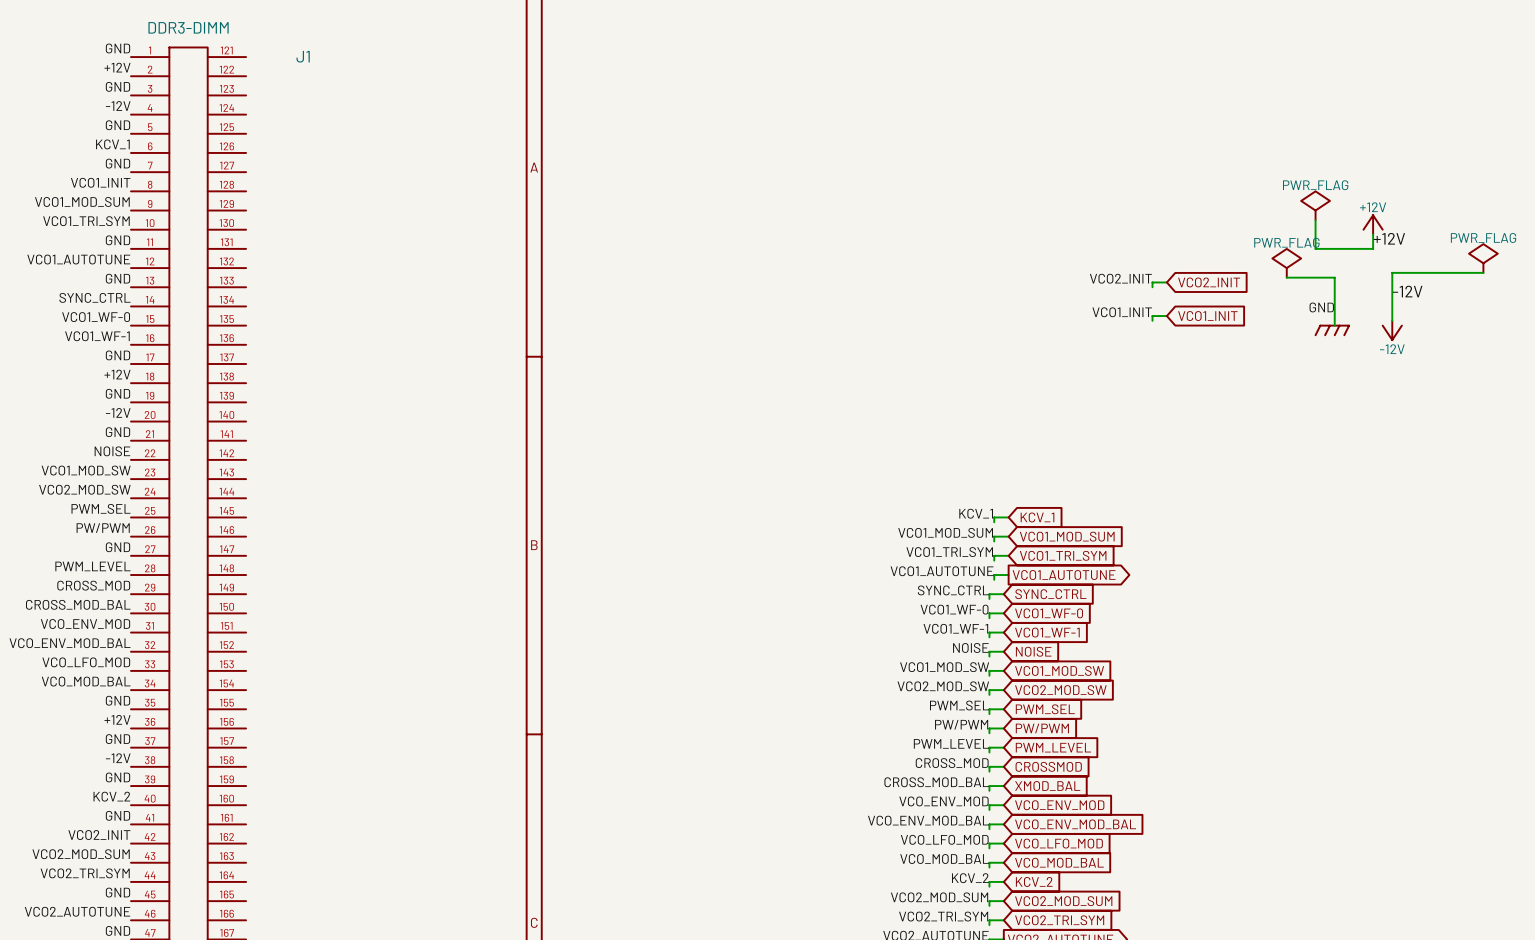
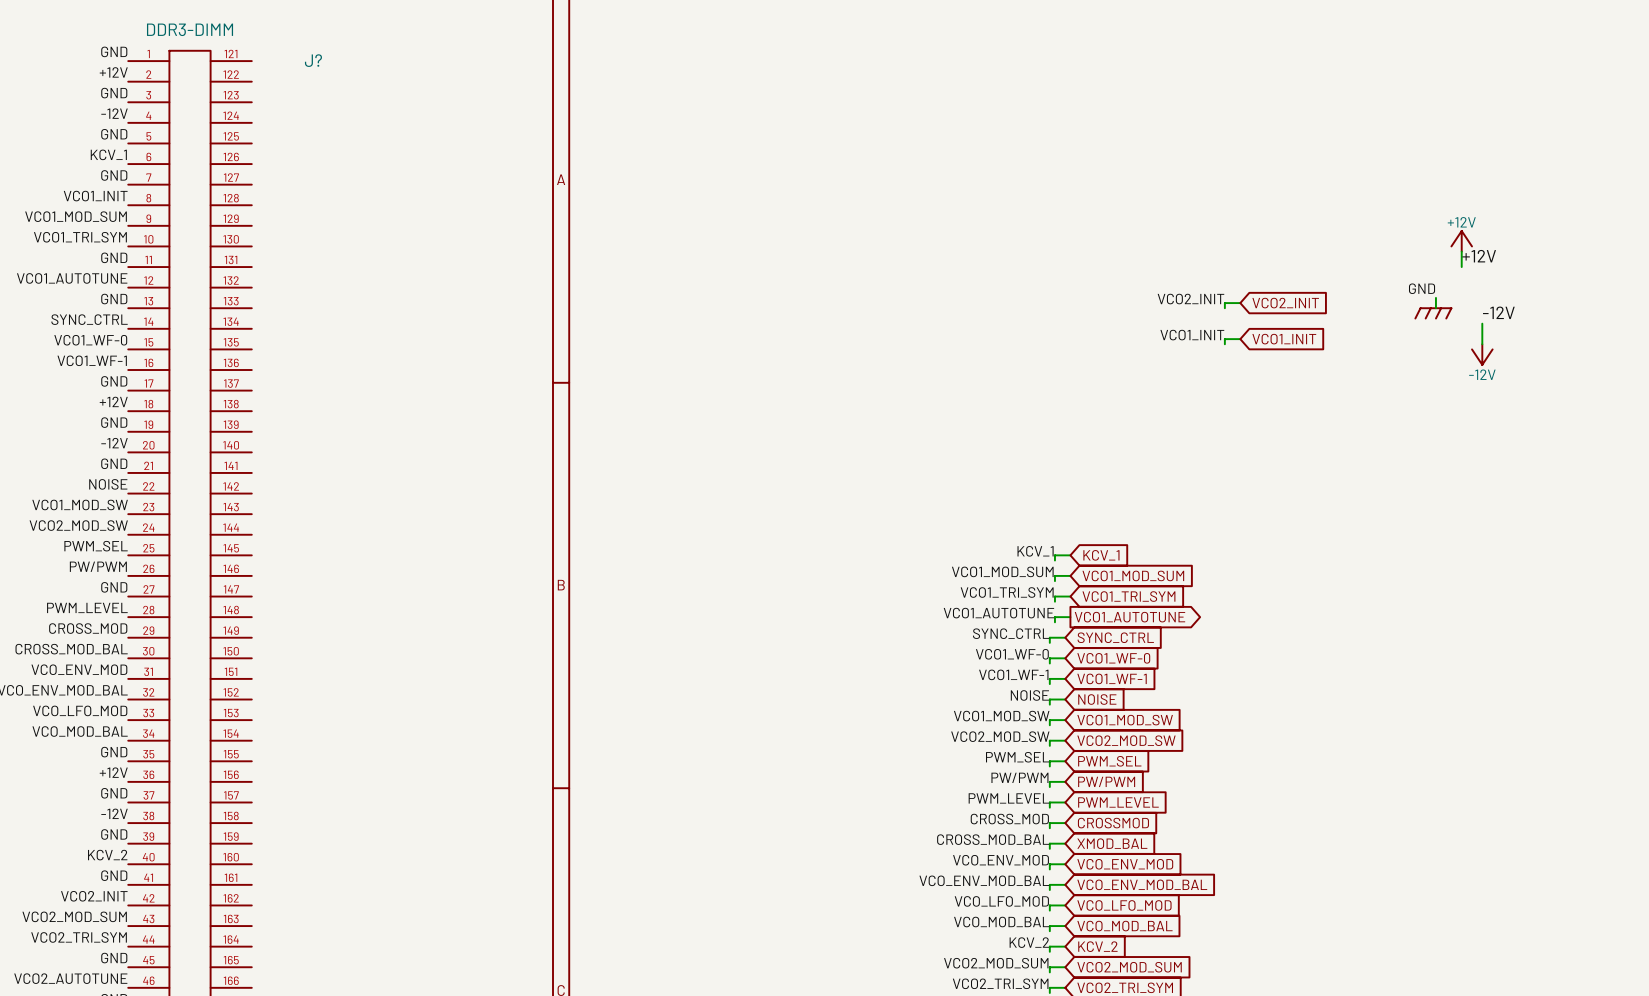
J1 name: J1 (303, 56) -> J? (313, 60)
power symbol: PWR_FLAG (1315, 205) -> none
wire: (1315, 220) (1315, 248) (1373, 248) -> none
power symbol: PWR_FLAG (1483, 258) -> none
power symbol: PWR_FLAG (1286, 263) -> none
wire: (1483, 272) (1392, 272) (1392, 301) -> none
wire: (1286, 277) (1334, 277) (1334, 325) -> none
wire: none -> (1435, 297) (1435, 308)
label position: GND (1321, 307) -> GND (1422, 288)
power symbol position: (1332, 330) -> (1433, 313)

